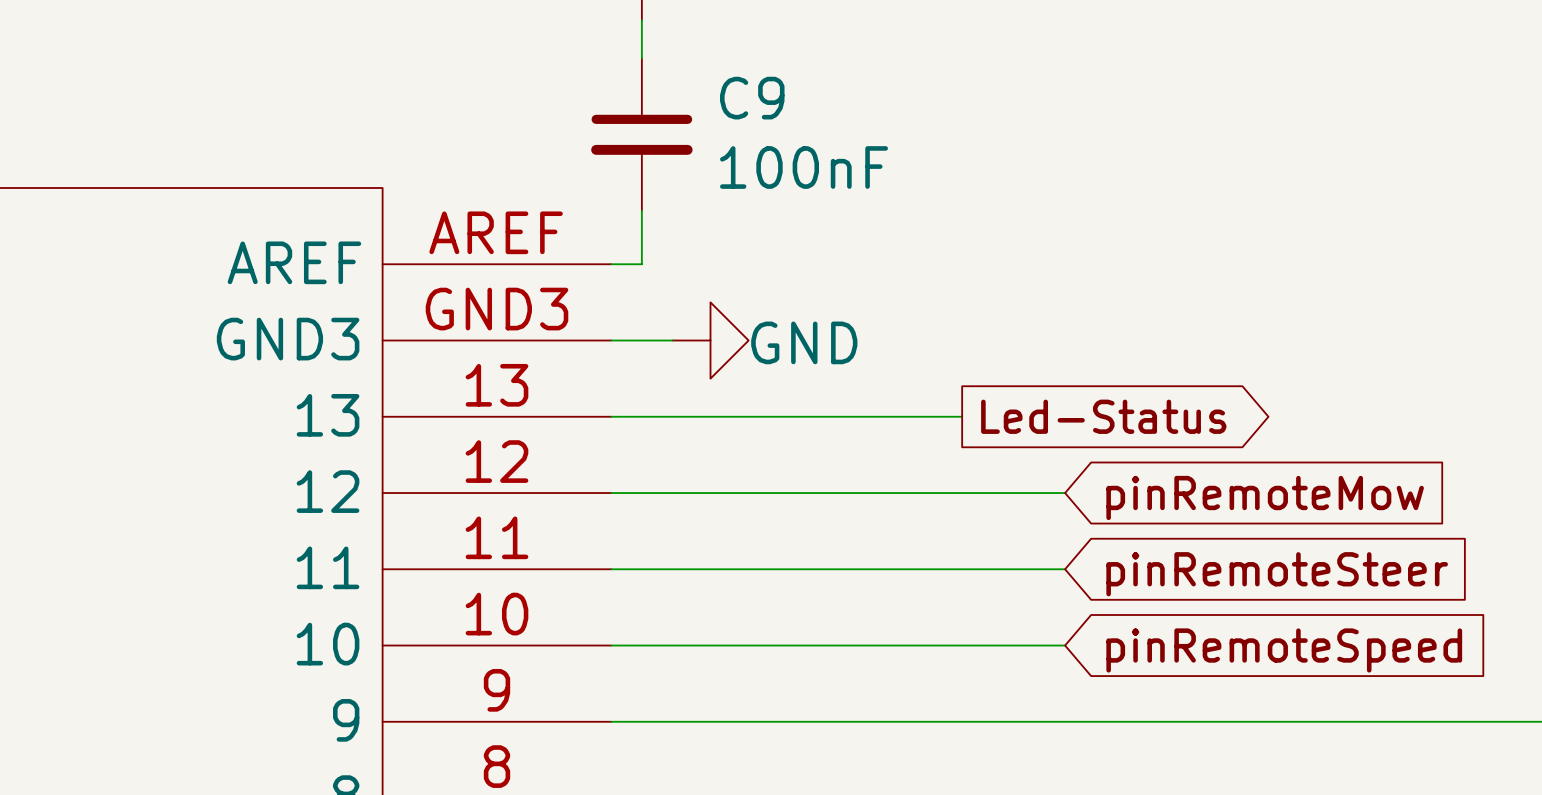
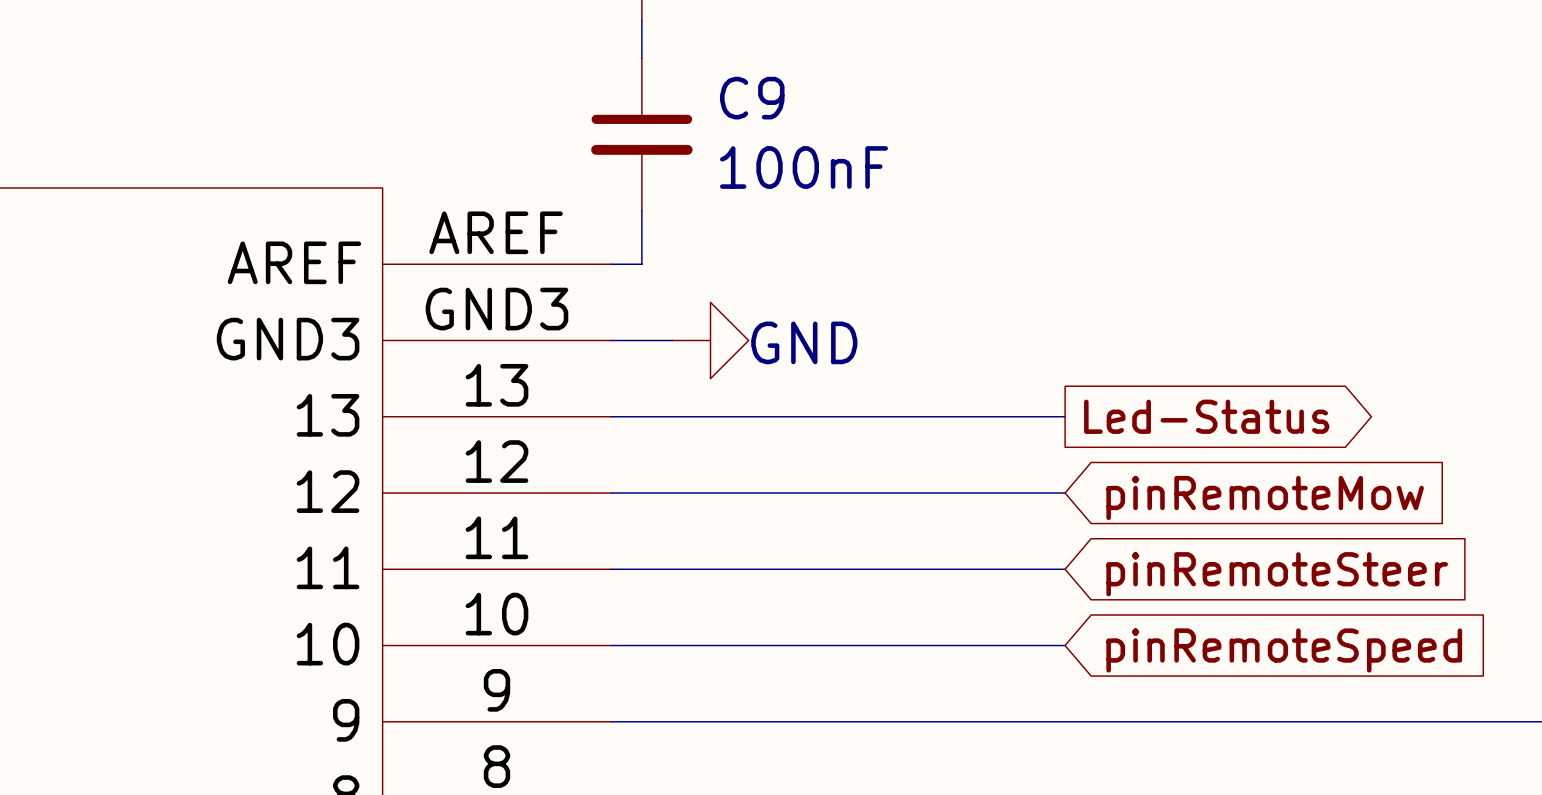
wire: none -> (962, 416) (1065, 416)
global label position: Led-Status (1103, 416) -> Led-Status (1206, 416)

